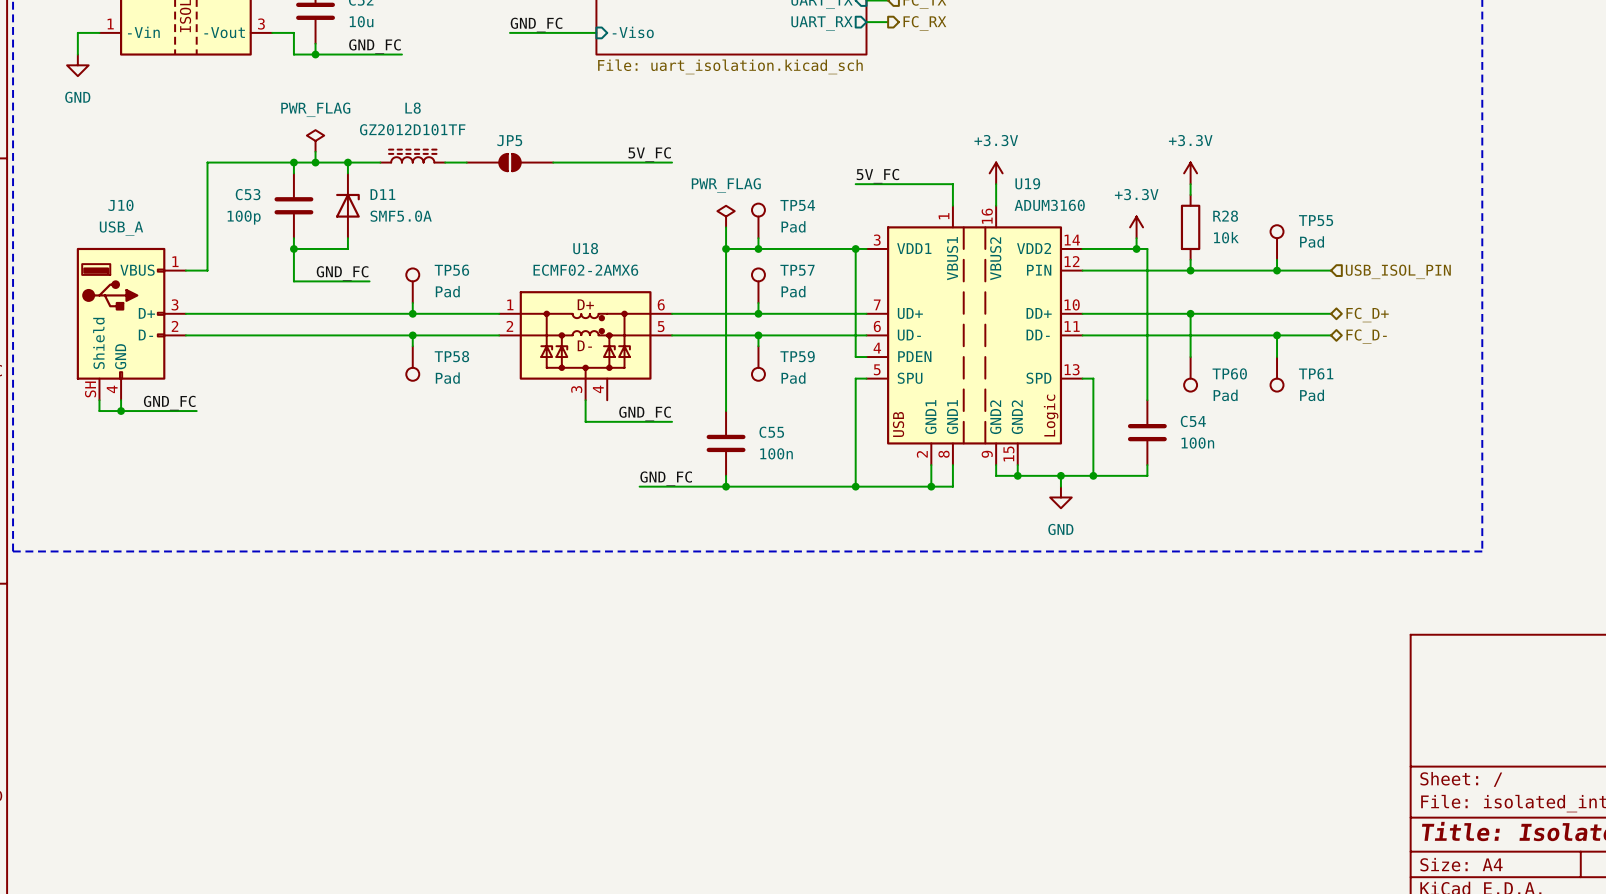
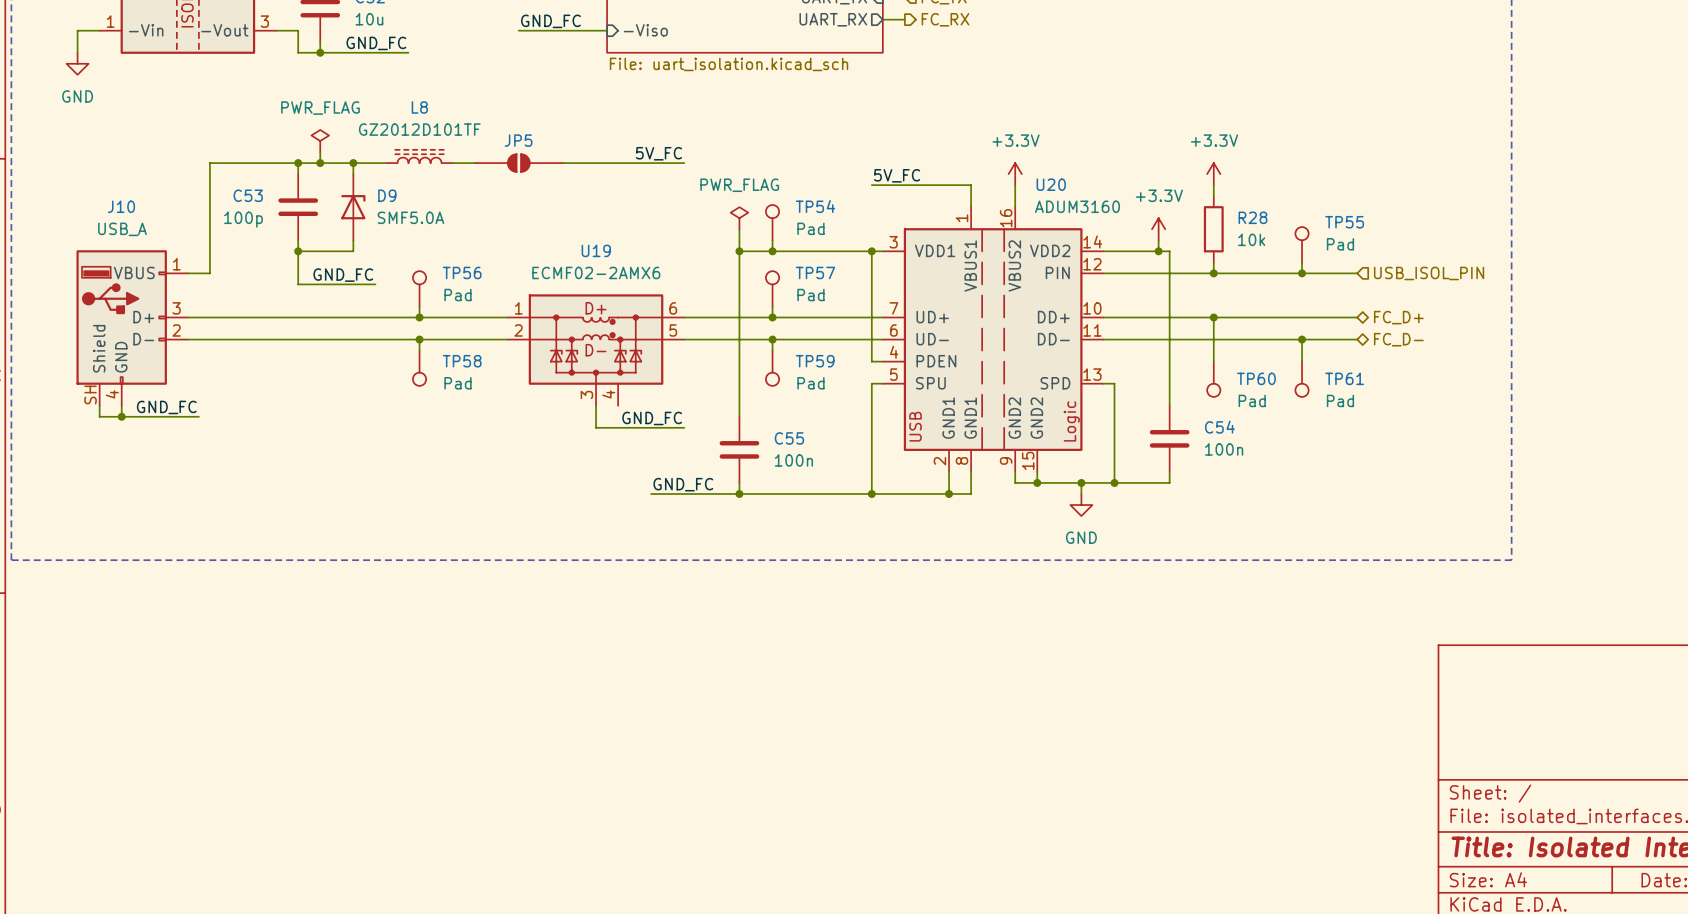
U19 name: U19 (1027, 183) -> U20 (1051, 184)
D11 name: D11 (382, 194) -> D9 (387, 195)
U18 name: U18 (585, 248) -> U19 (596, 250)

